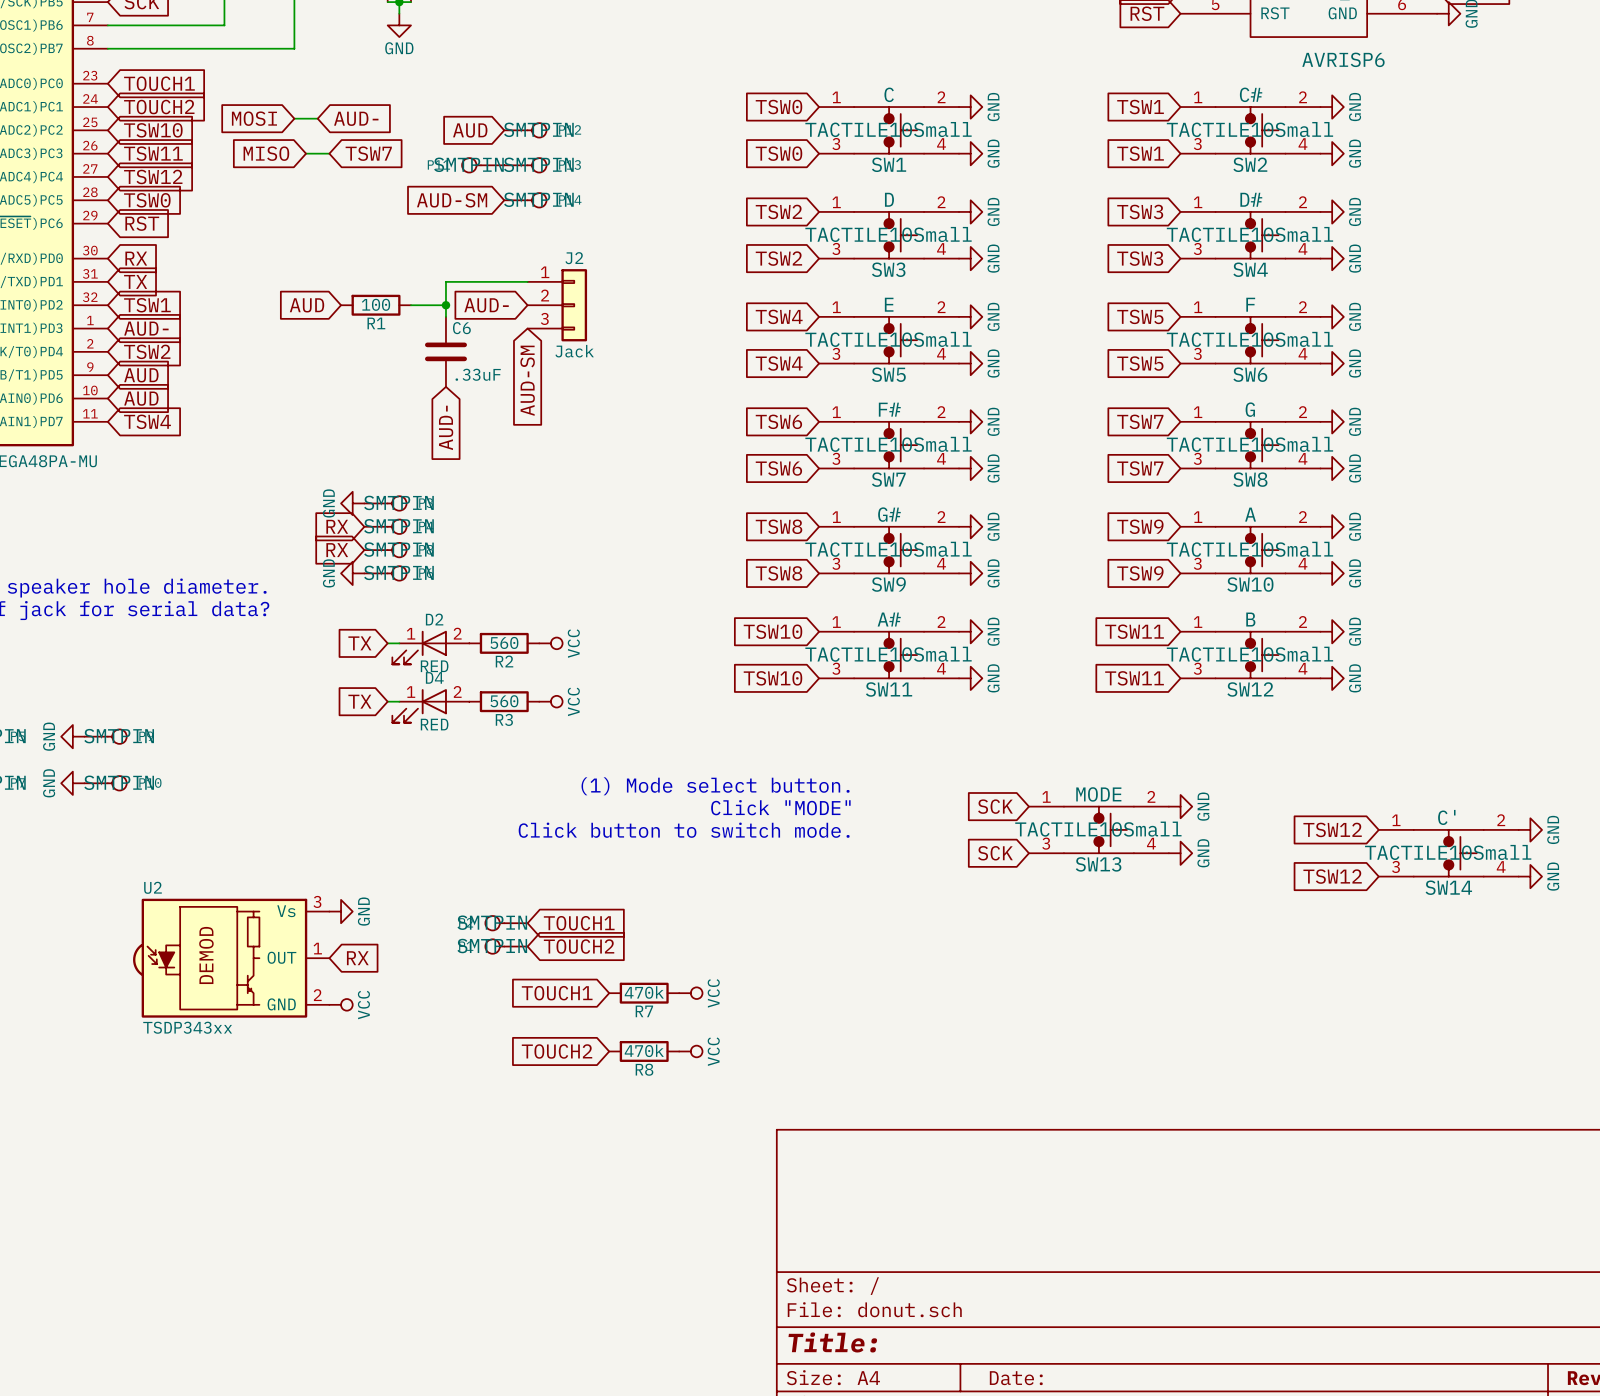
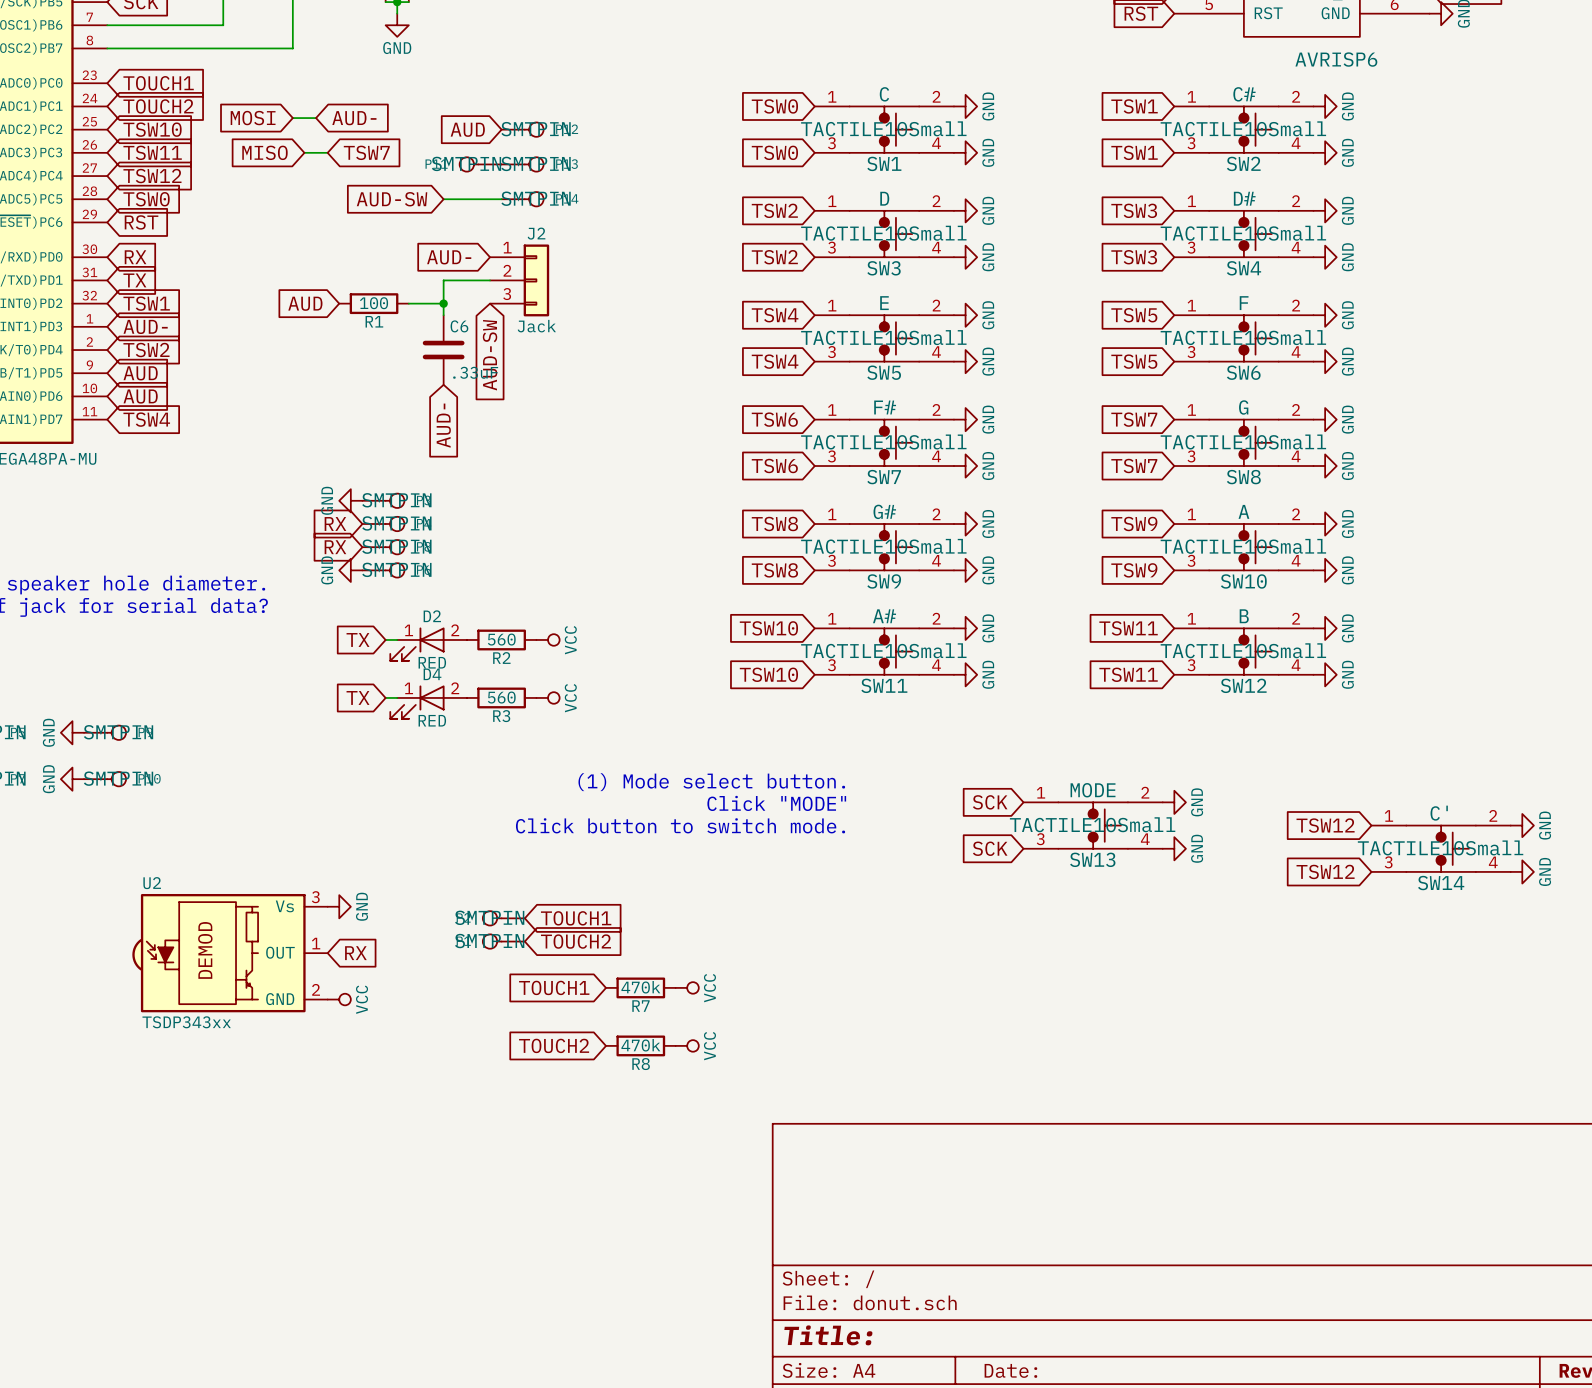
wire: none -> (443, 199) (501, 199)
global label: AUD-SM (452, 200) -> AUD-SW (392, 199)
global label position: AUD- (486, 305) -> AUD- (449, 257)
J2 position: (557, 305) -> (519, 280)
global label: none -> AUD-SW (490, 355)
global label: AUD-SM (527, 380) -> none

